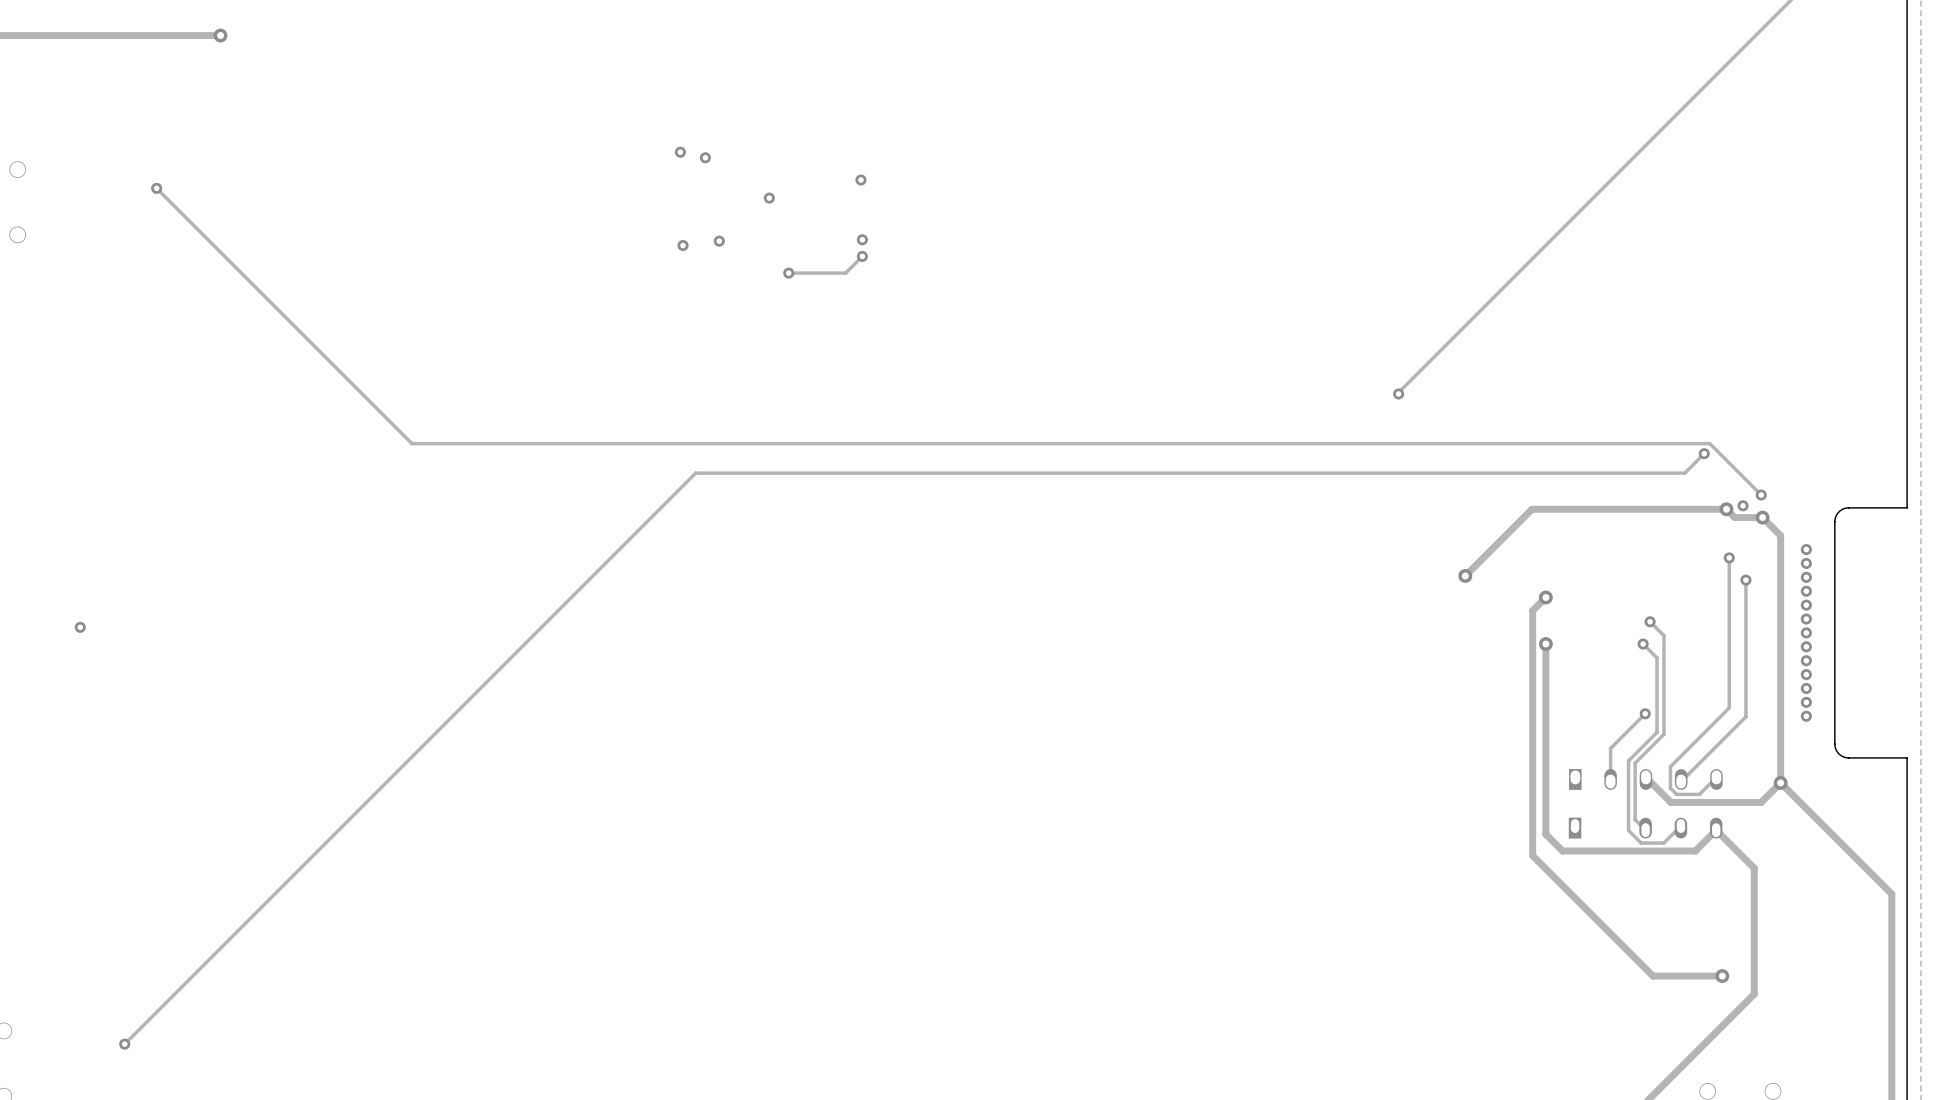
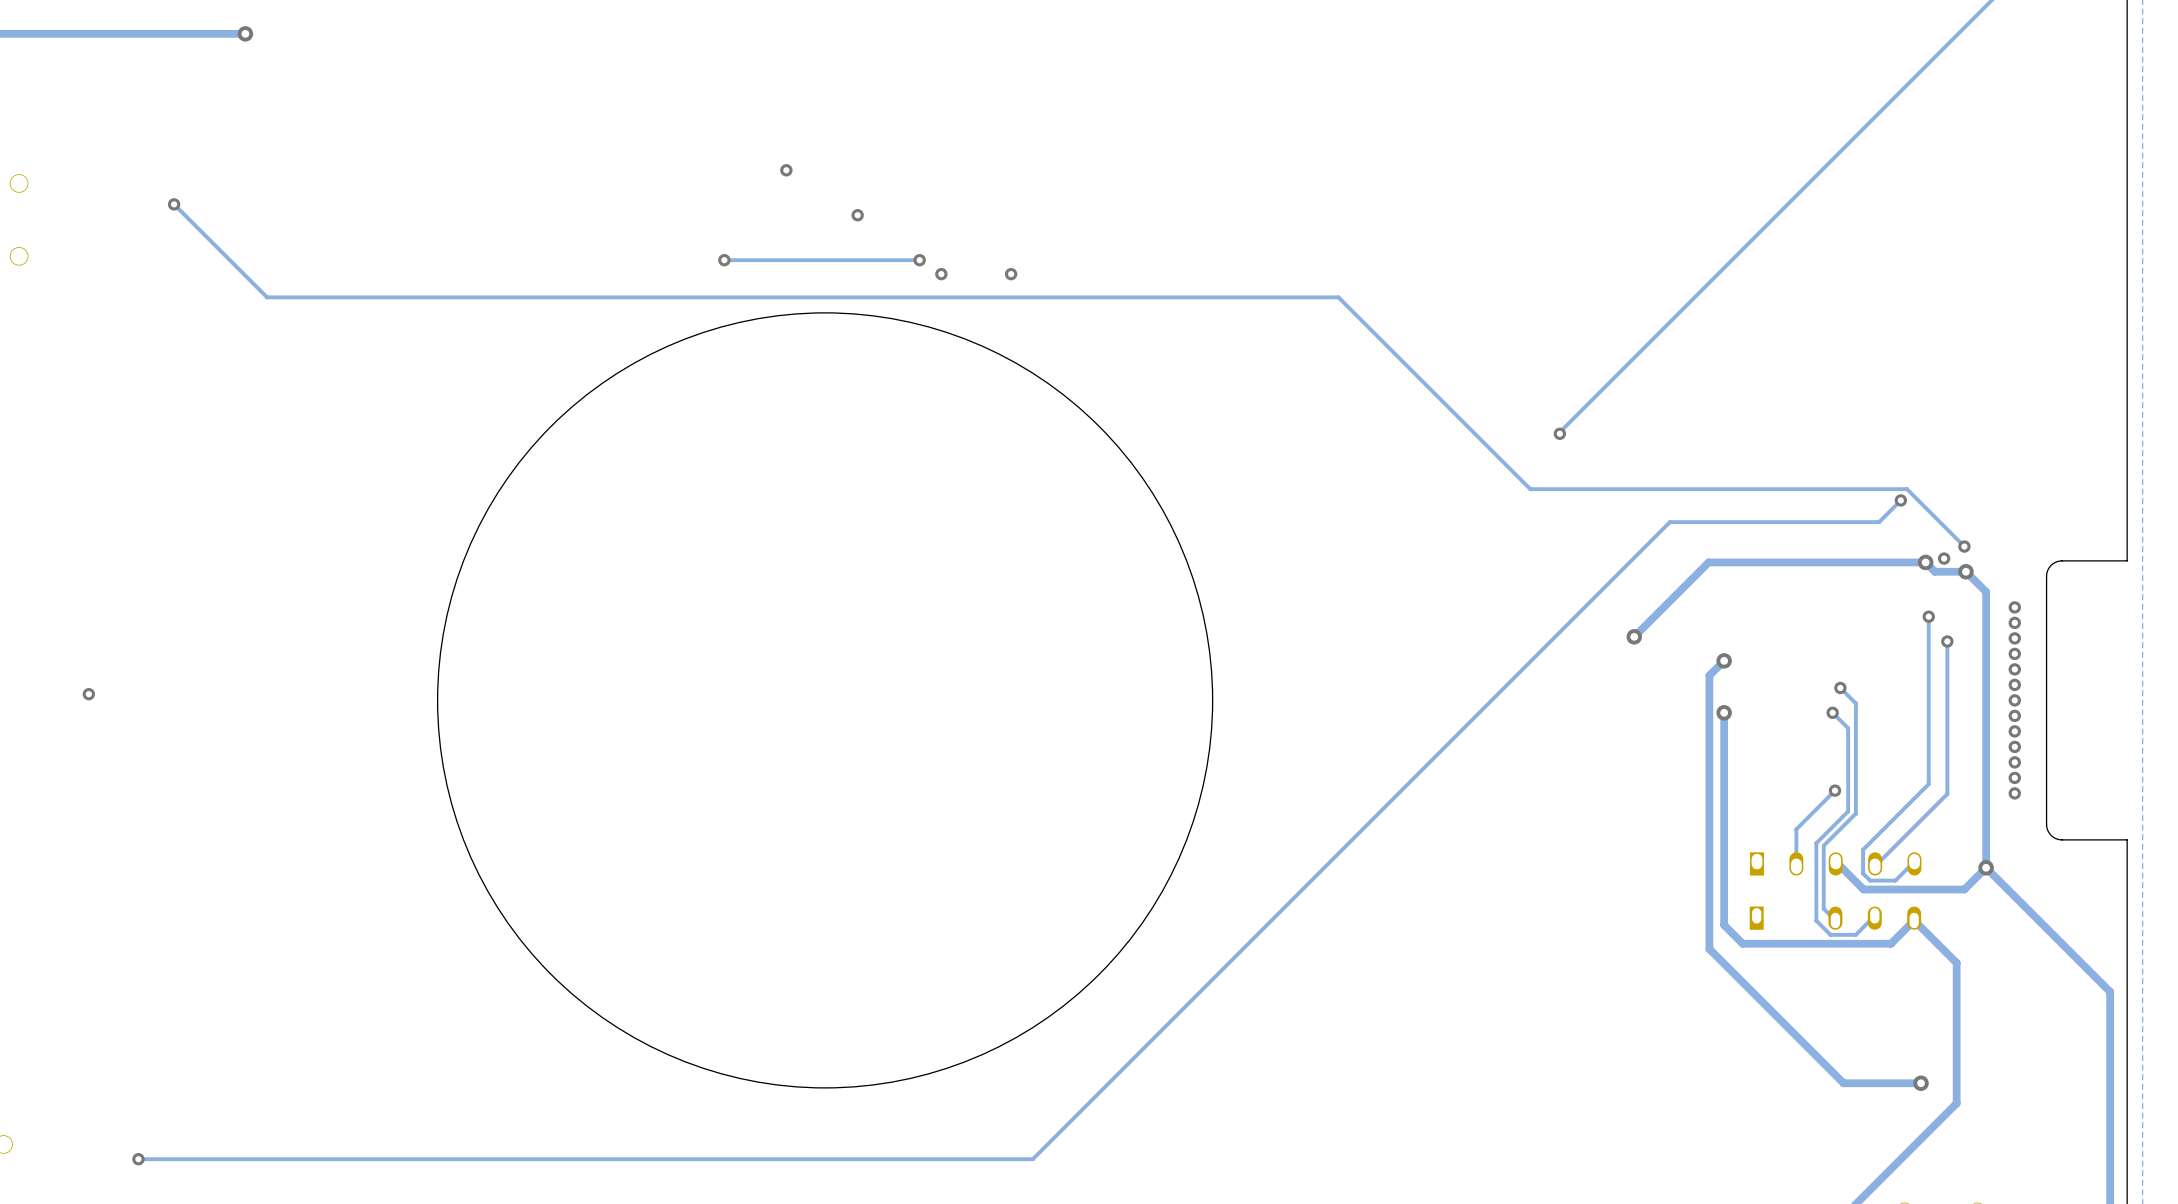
via: (680, 152) -> none
via: (860, 180) -> none
track: none -> (919, 260) (724, 260)
via: none -> (919, 260)
via: (862, 239) -> none
via: (719, 241) -> none
via position: (683, 245) -> (724, 260)
via: none -> (941, 274)
via: none -> (1011, 274)
track: (862, 256) (845, 273) (788, 273) -> none
via: (862, 256) -> none
track: (240, 271) (411, 443) (1372, 443) -> (267, 297) (1338, 297) (1530, 489)
via: (788, 273) -> none
round board edge: none -> [437, 312, 1214, 1089]
track: (1497, 473) (695, 473) (124, 1044) -> (1669, 522) (1032, 1159) (138, 1159)

